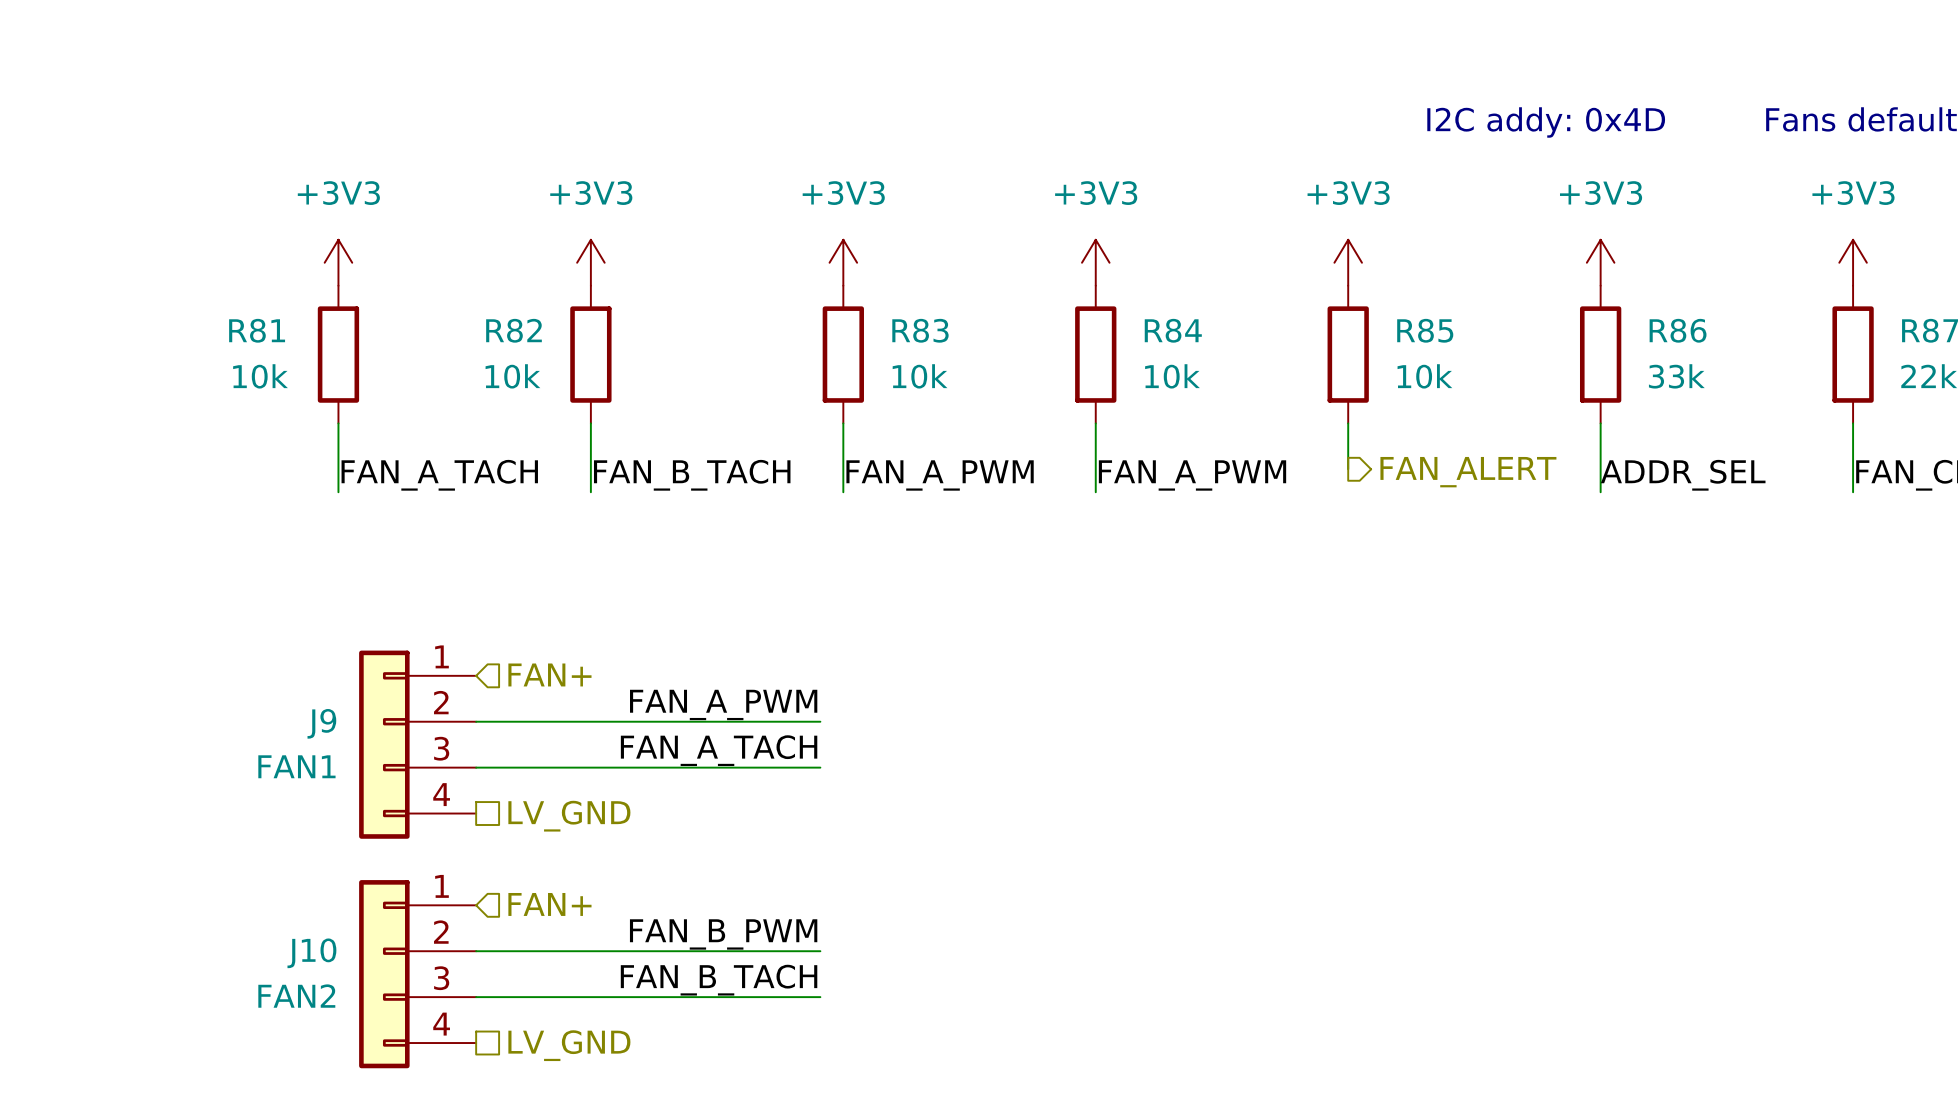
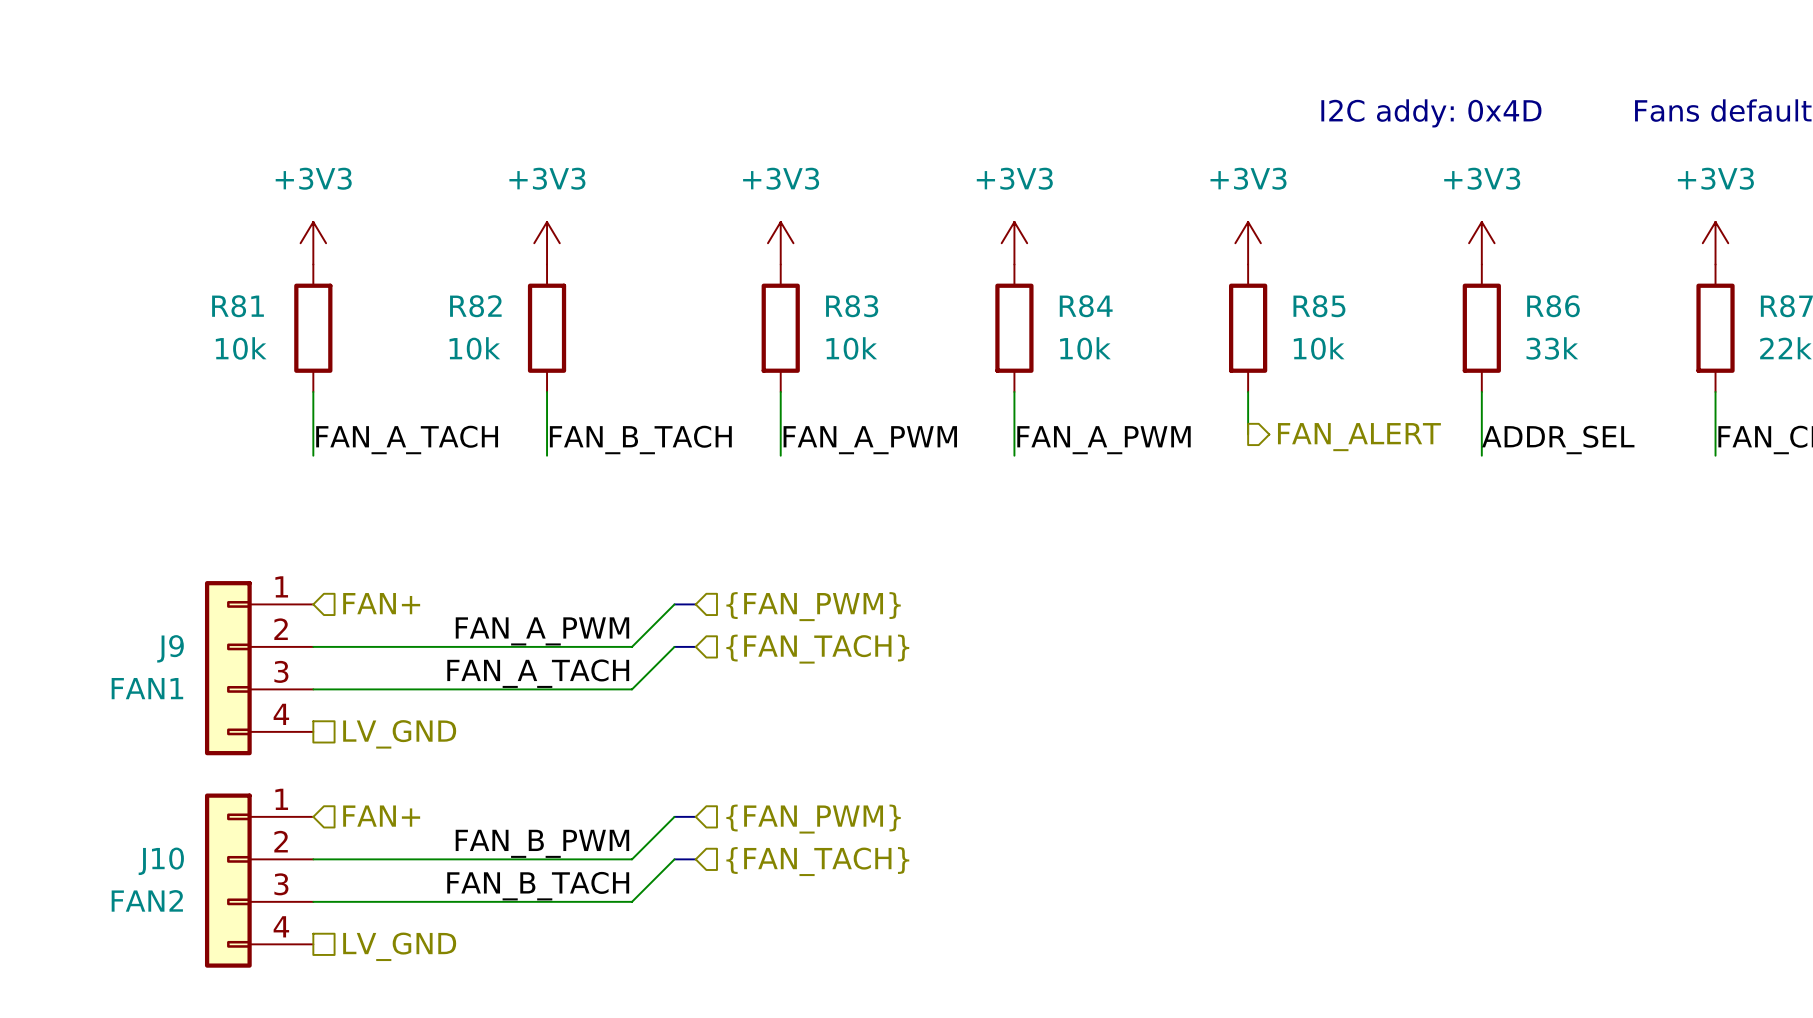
hierarchical label: none -> FAN+ (381, 603)
wire: none -> (674, 604) (632, 646) (313, 646)
bus: none -> (674, 604) (695, 604)
hierarchical label: none -> {FAN_PWM} (813, 606)
hierarchical label: FAN+ (549, 674) -> none
wire: none -> (674, 646) (632, 689) (313, 689)
bus: none -> (674, 646) (695, 646)
hierarchical label: none -> {FAN_TACH} (817, 649)
label position: FAN_A_PWM (723, 704) -> FAN_A_PWM (542, 631)
wire: (476, 721) (820, 721) -> none
J9 position: (417, 744) -> (259, 668)
label position: FAN_A_TACH (719, 750) -> FAN_A_TACH (538, 673)
wire: (476, 767) (820, 767) -> none
hierarchical label position: LV_GND (569, 816) -> LV_GND (399, 734)
hierarchical label: none -> FAN+ (381, 816)
wire: none -> (674, 816) (632, 859) (313, 859)
bus: none -> (674, 816) (695, 816)
hierarchical label: none -> {FAN_PWM} (813, 819)
hierarchical label: FAN+ (549, 904) -> none
wire: none -> (674, 859) (632, 901) (313, 901)
bus: none -> (674, 859) (695, 859)
hierarchical label: none -> {FAN_TACH} (817, 861)
label position: FAN_B_PWM (723, 934) -> FAN_B_PWM (542, 843)
wire: (476, 951) (820, 951) -> none
J10 position: (417, 974) -> (259, 880)
label position: FAN_B_TACH (719, 980) -> FAN_B_TACH (538, 886)
wire: (476, 997) (820, 997) -> none
hierarchical label position: LV_GND (569, 1045) -> LV_GND (399, 946)

